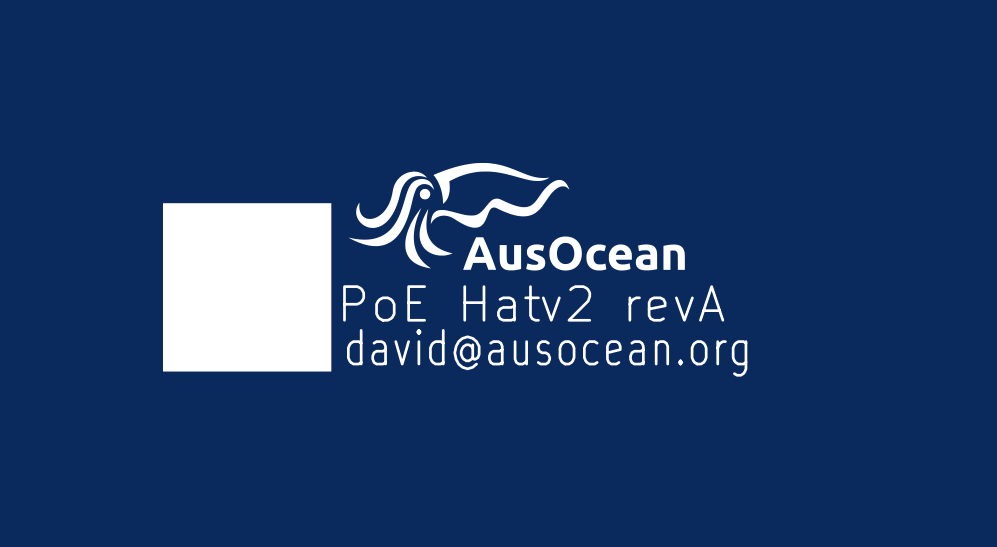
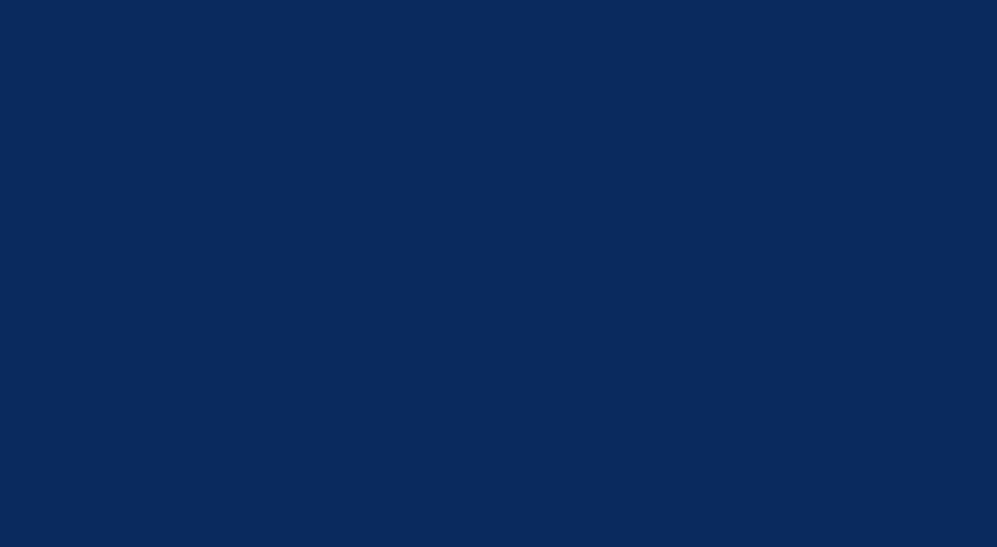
drawing: [162, 162, 685, 372] -> none
text: PoE Hat (441, 303) -> none
text: v2 revA (633, 303) -> none
text: david@ausocean.org (547, 352) -> none

